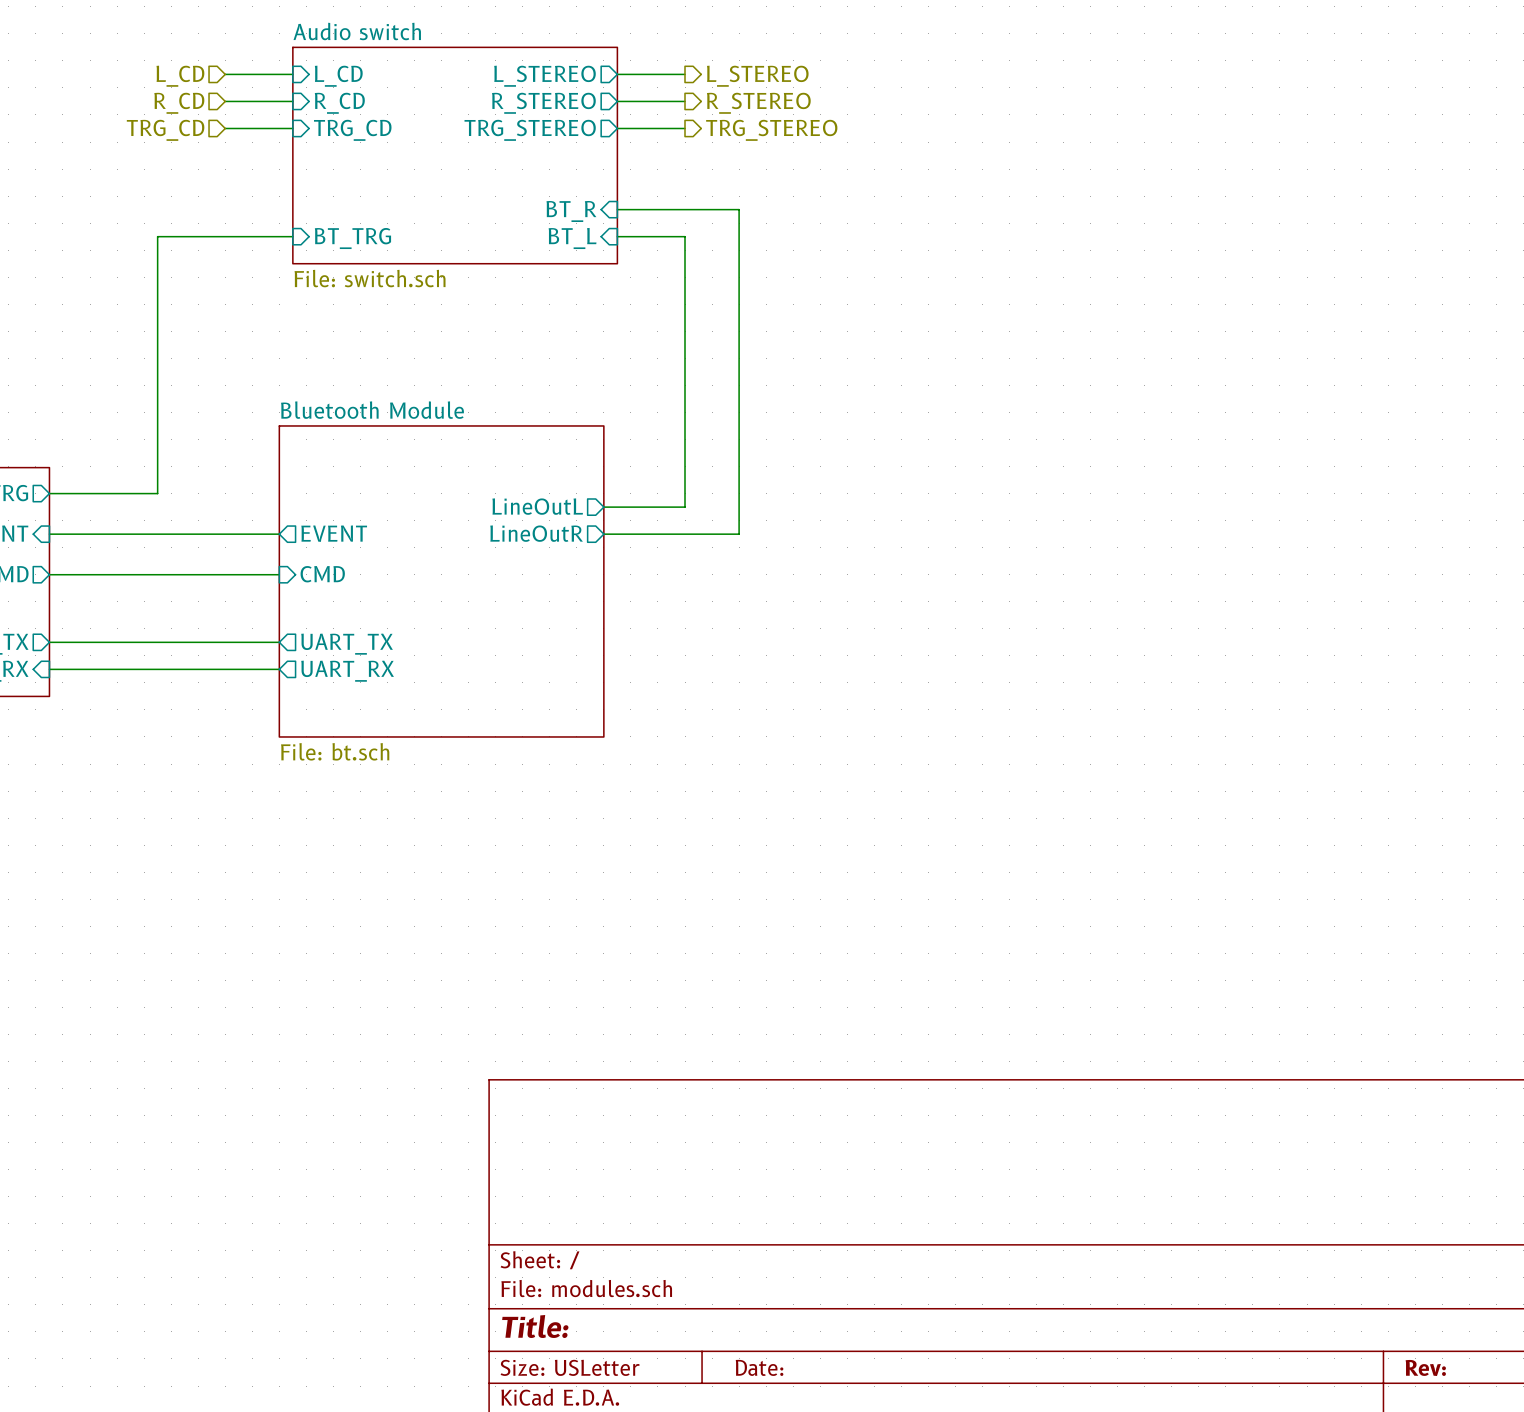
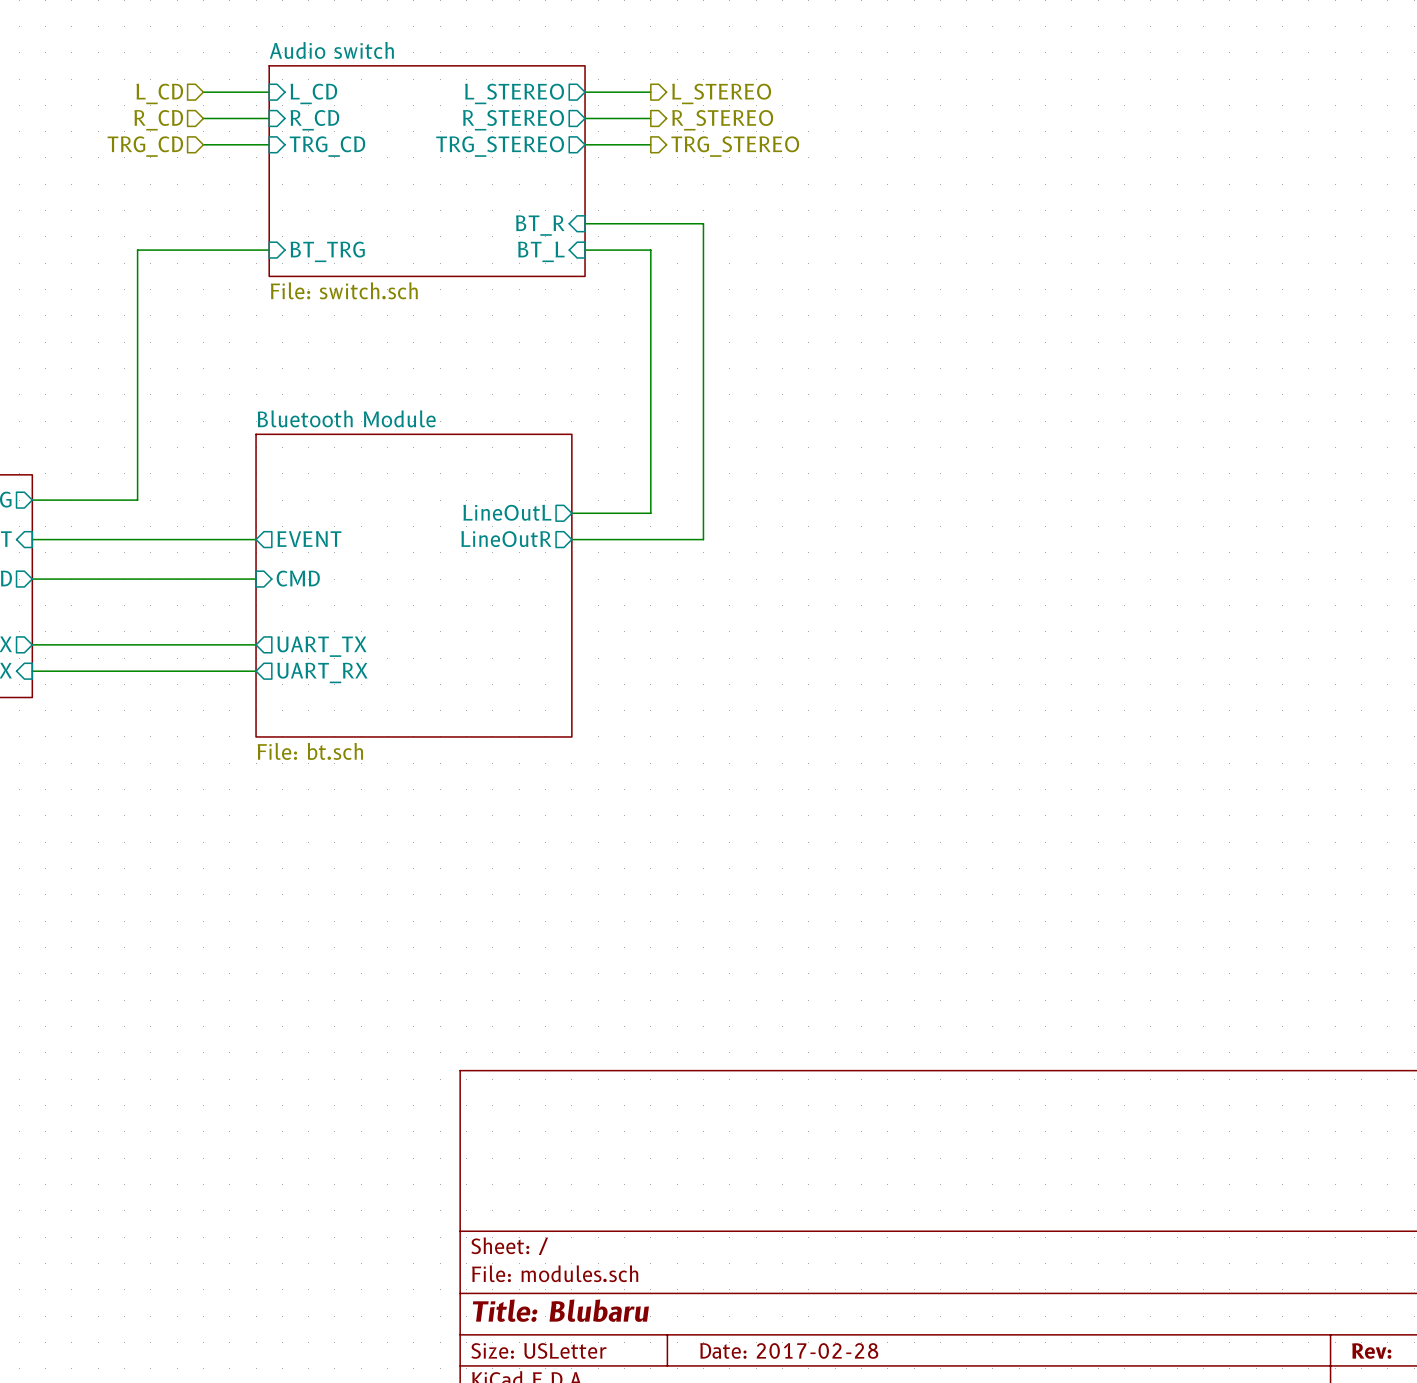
title block: Title: (535, 1326) -> Title: Blubaru (560, 1310)
title block: Date: (759, 1367) -> Date: 2017-02-28 (789, 1350)

